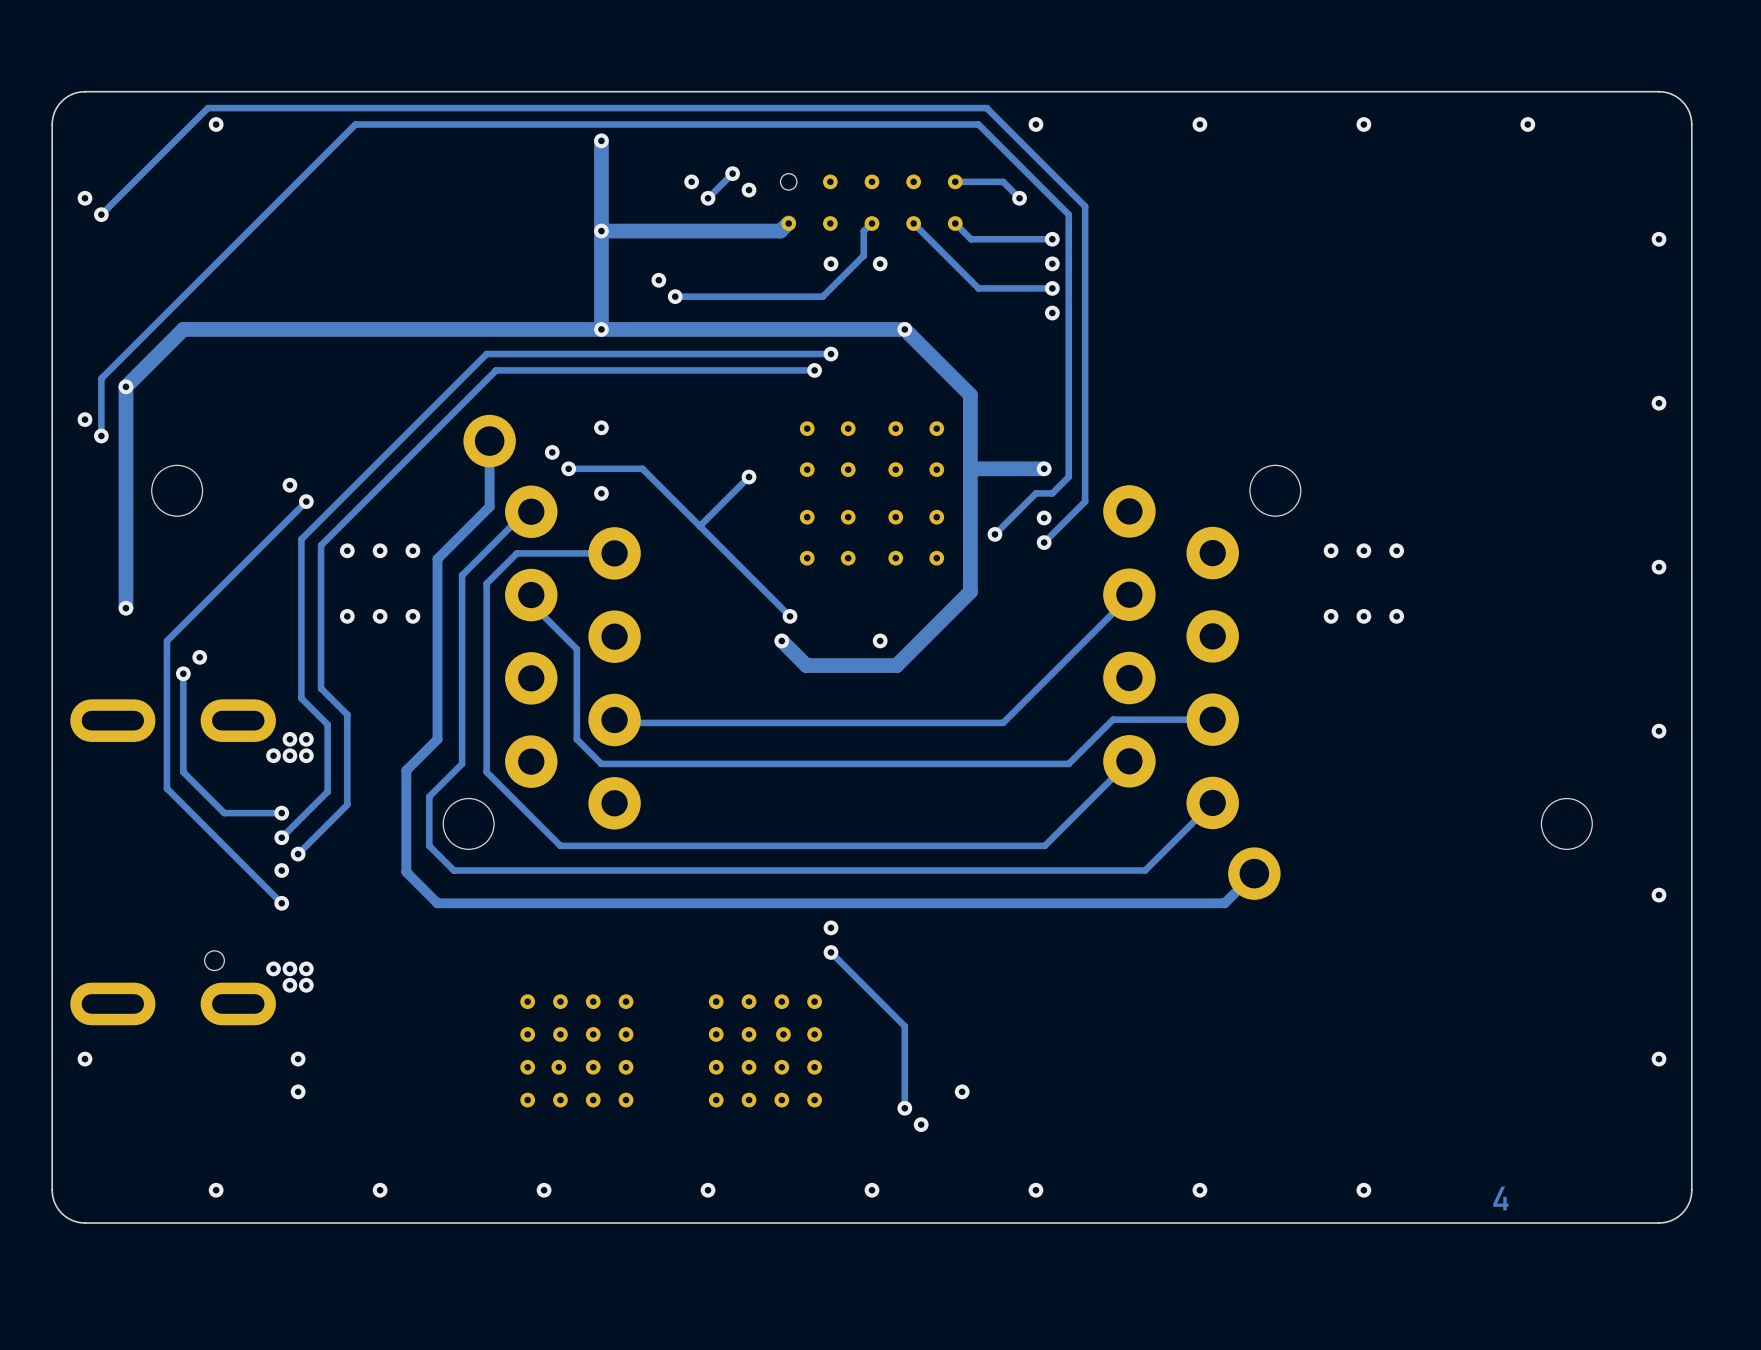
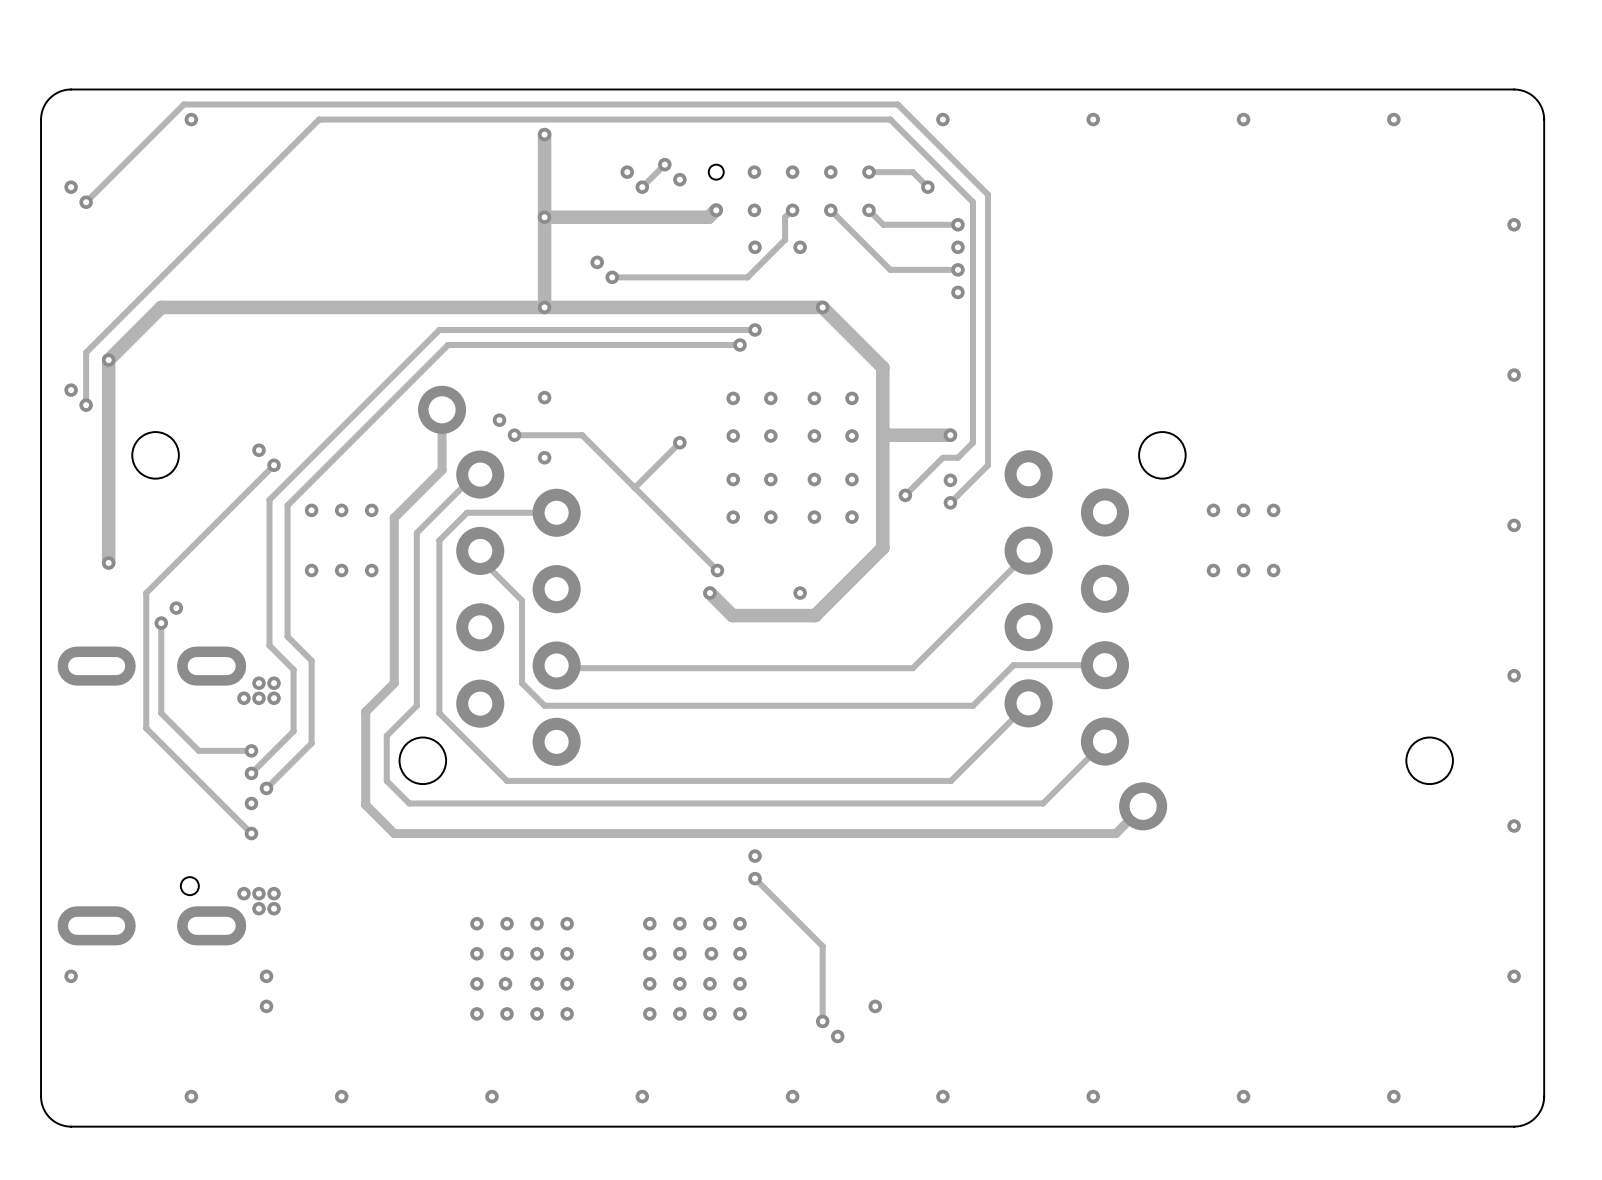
drawing: [1493, 1186, 1509, 1211] -> none
via: none -> (1393, 1096)

